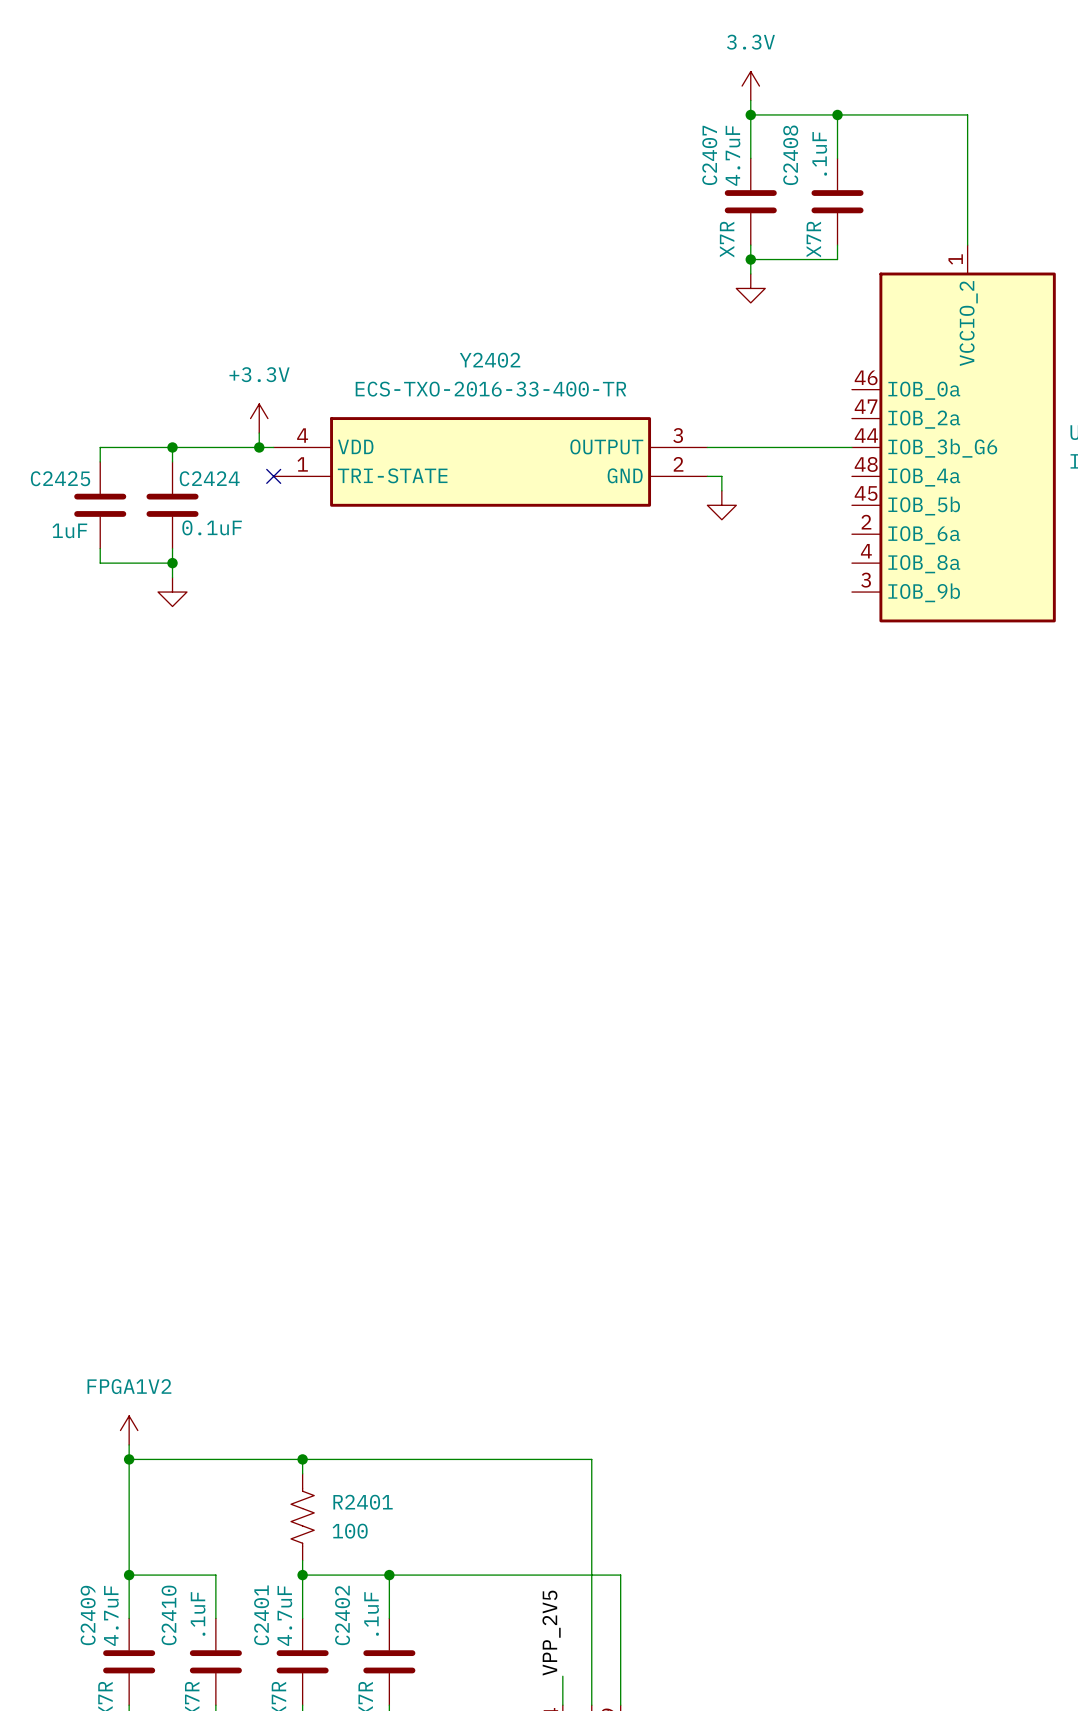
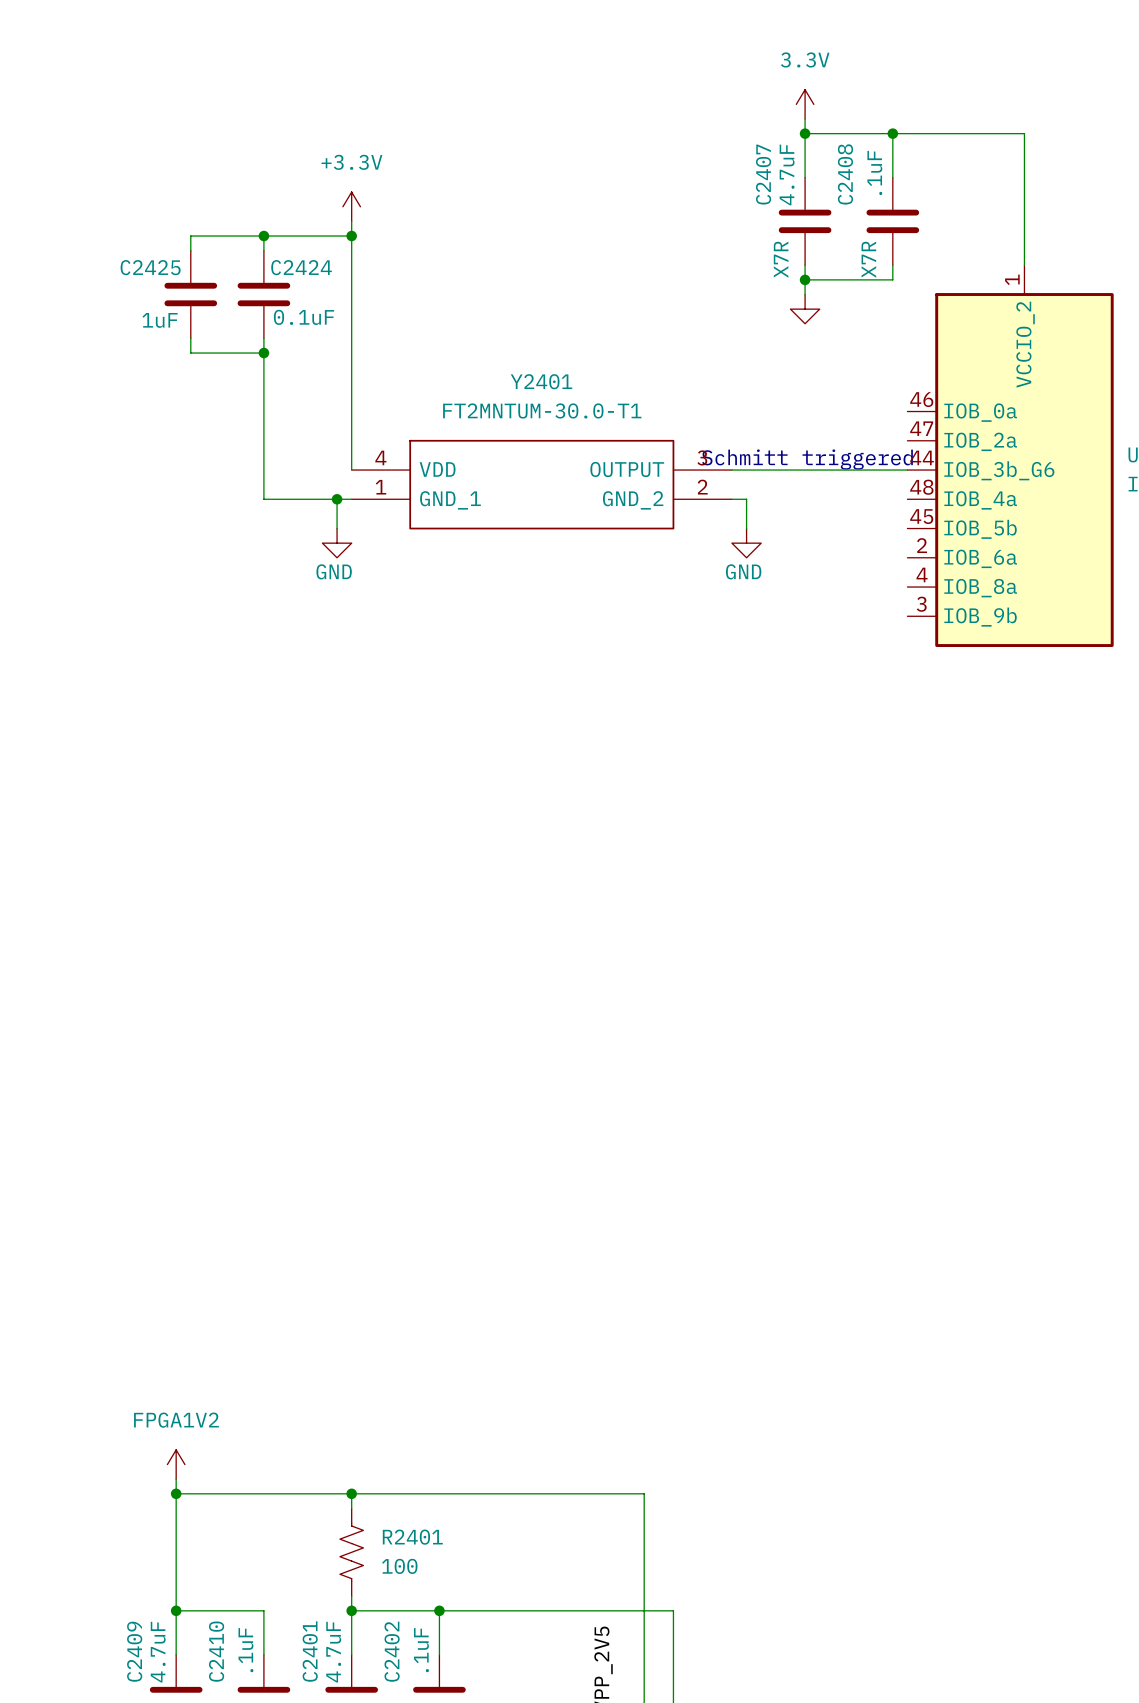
wire: none -> (351, 221) (351, 470)
junction: none -> (263, 236)
wire: none -> (351, 236) (190, 236) (190, 250)
junction: none -> (351, 236)
wire: none -> (263, 338) (263, 499) (351, 499)
junction: none -> (263, 353)
power symbol position: +3.3V (259, 418) -> +3.3V (351, 206)
wire: (259, 433) (259, 447) -> none
text: none -> Schmitt triggered (807, 459)
wire: (172, 447) (172, 461) -> (263, 236) (263, 250)
junction: (172, 447) -> none
junction position: (259, 447) -> (337, 499)
wire: (273, 447) (100, 447) (100, 461) -> none
Y2402: ECS-TXO-2016-33-400-TR (490, 461) -> none
Y2401: none -> FT2MNTUM-30.0-T1 (541, 484)
no-connect mark: (273, 476) -> none
wire: none -> (731, 499) (746, 499) (746, 528)
wire: (707, 476) (721, 476) (721, 490) -> none
C2425 position: (100, 505) -> (190, 294)
C2424 position: (172, 505) -> (263, 294)
power symbol: (721, 505) -> none
power symbol: none -> GND (337, 543)
power symbol: none -> GND (746, 543)
wire: (100, 548) (100, 563) (172, 563) -> (190, 338) (190, 353) (263, 353)
wire: (172, 548) (172, 577) -> (337, 499) (337, 528)
junction: (172, 563) -> none
power symbol: (172, 592) -> none

